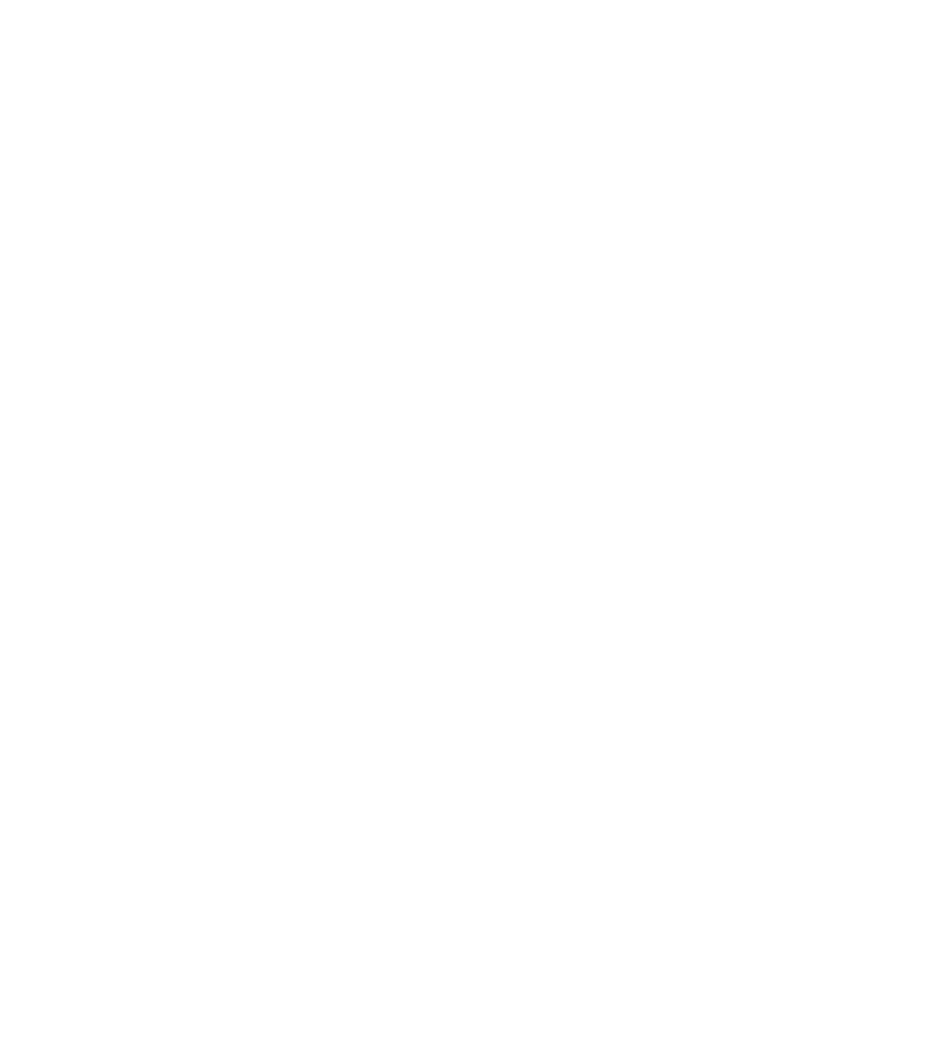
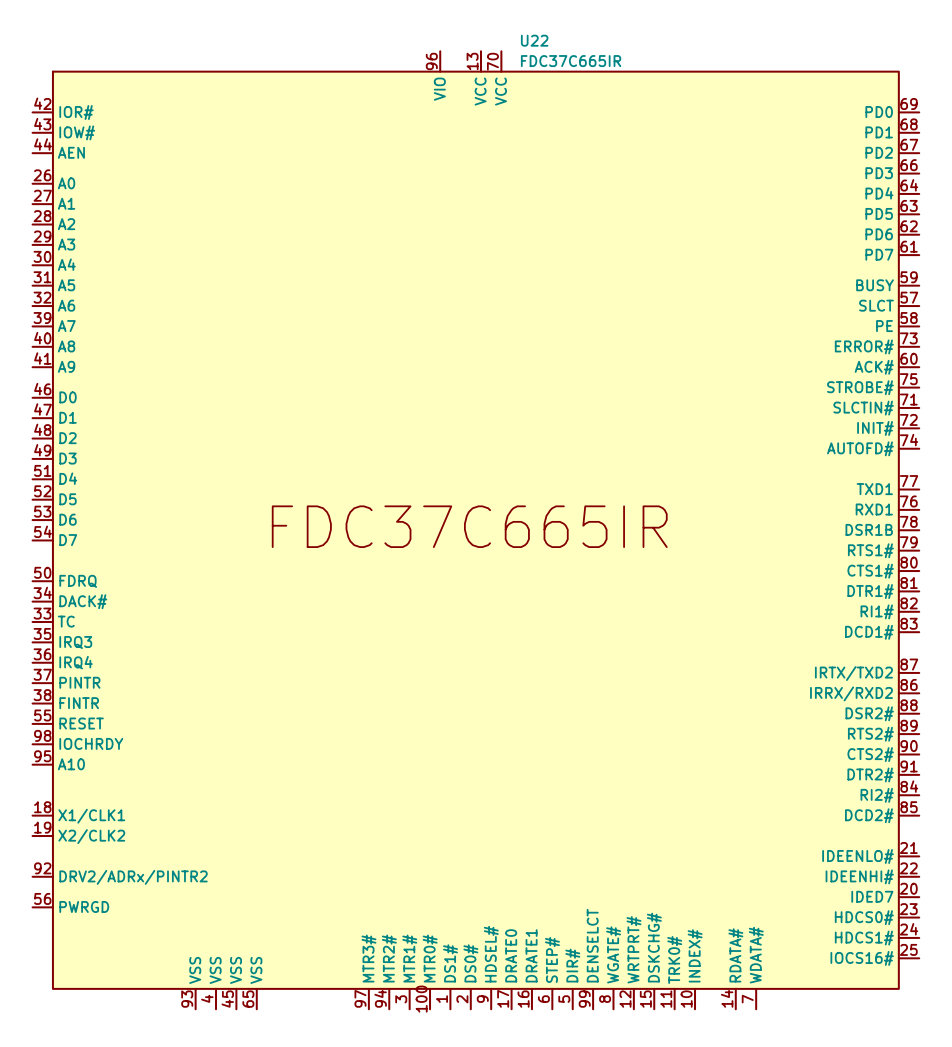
U22: none -> FDC37C665IR (475, 530)

